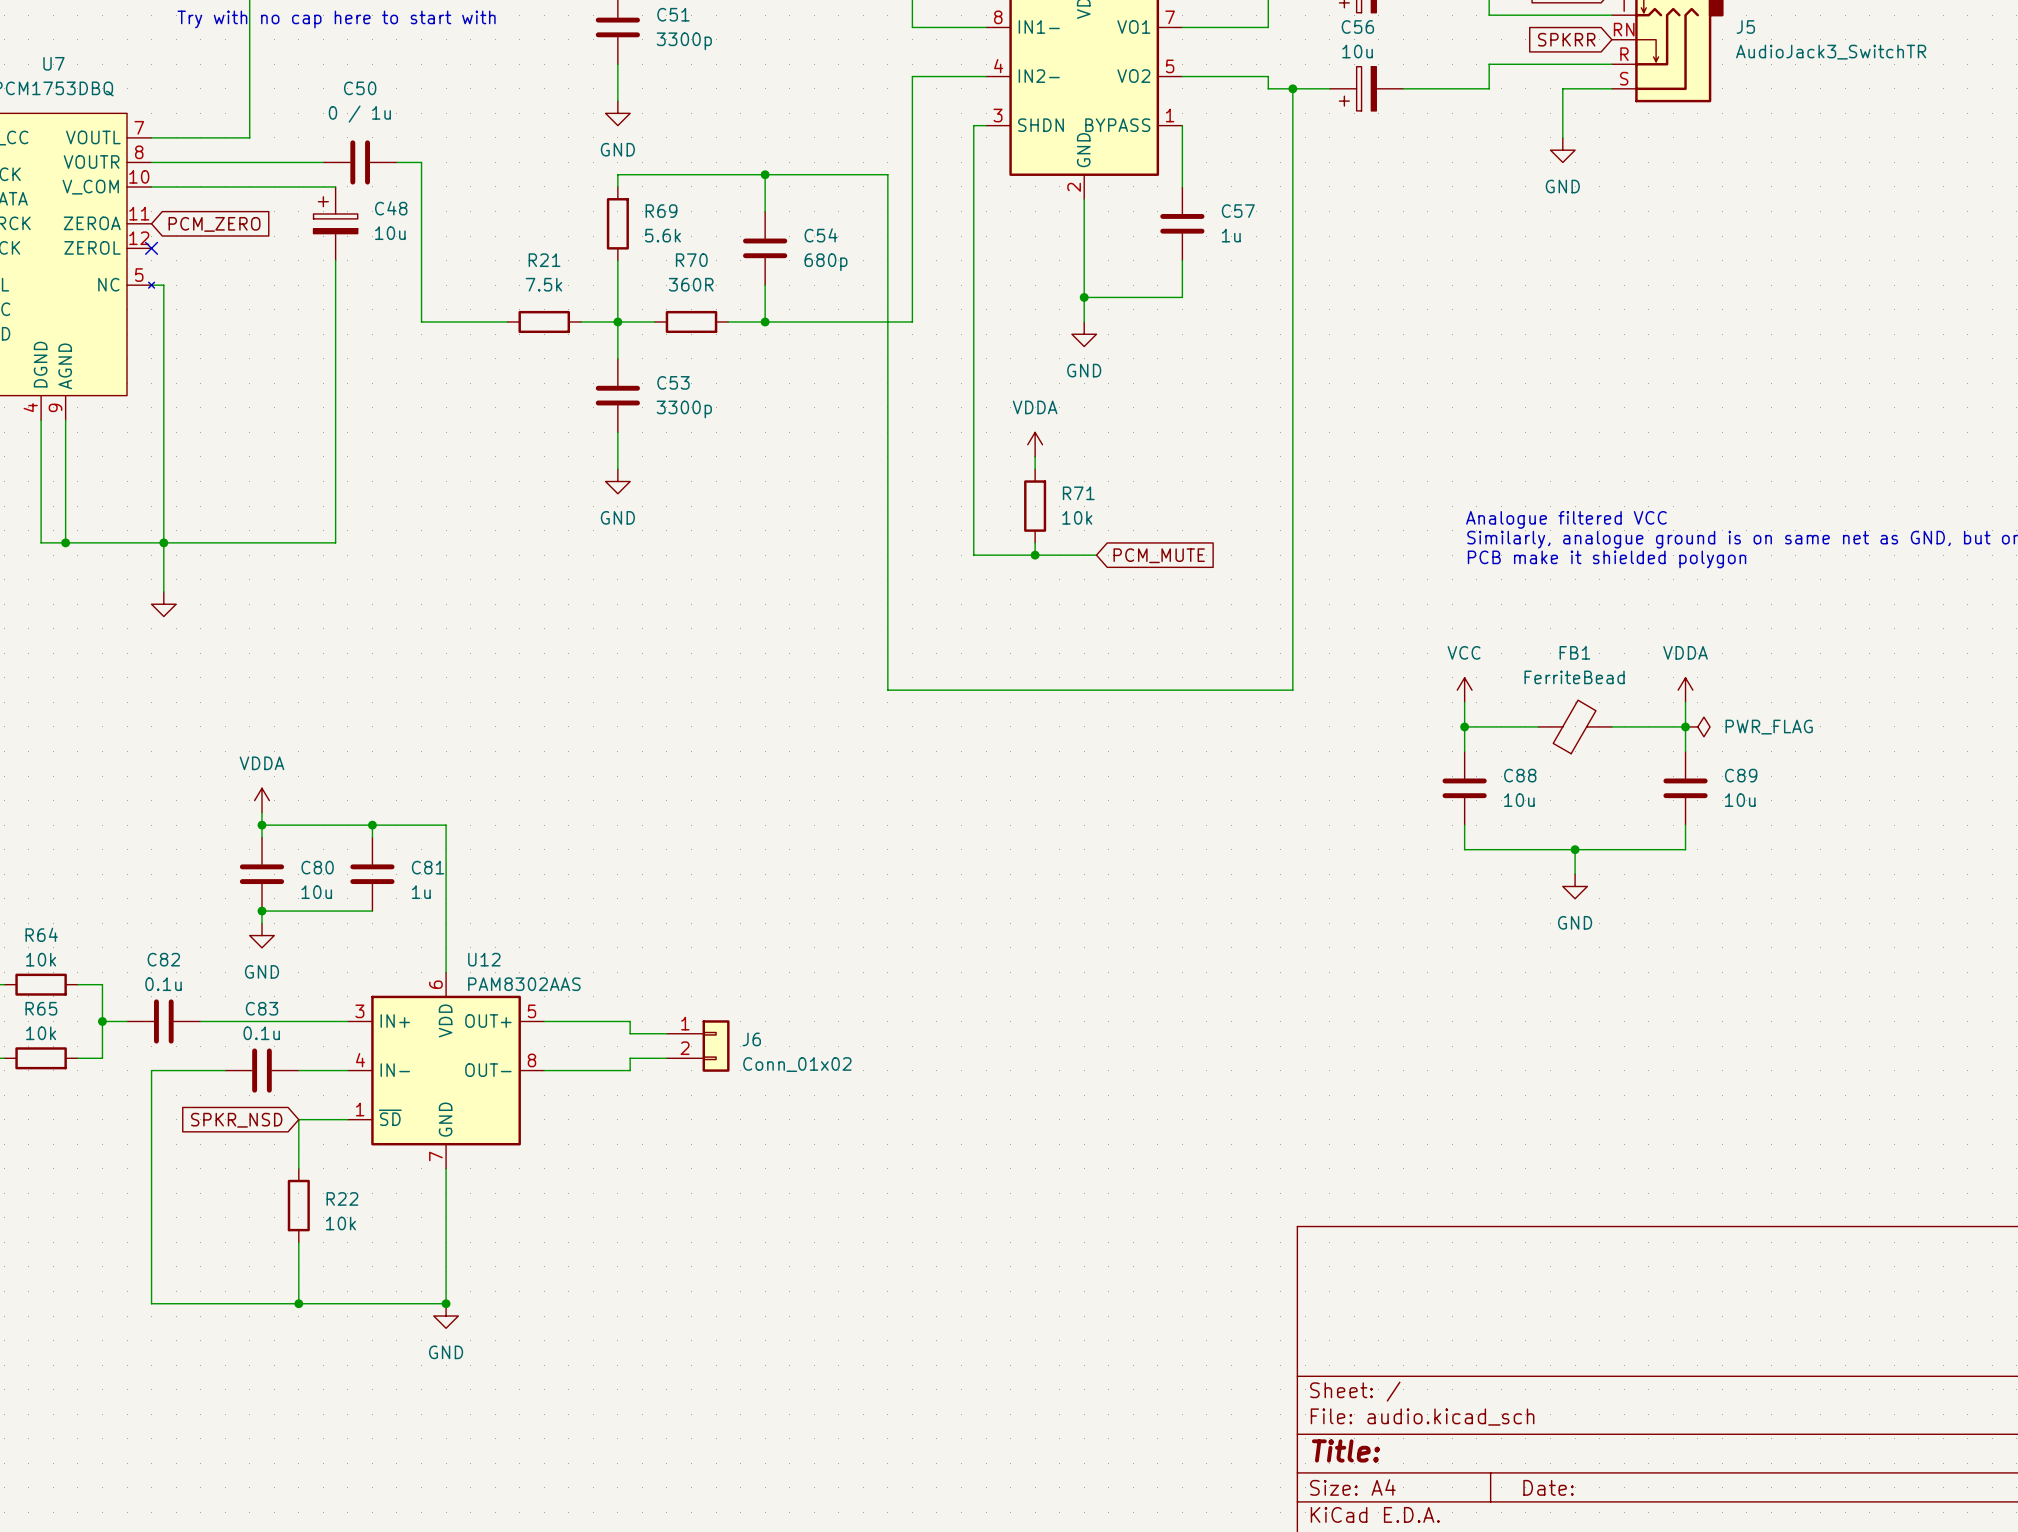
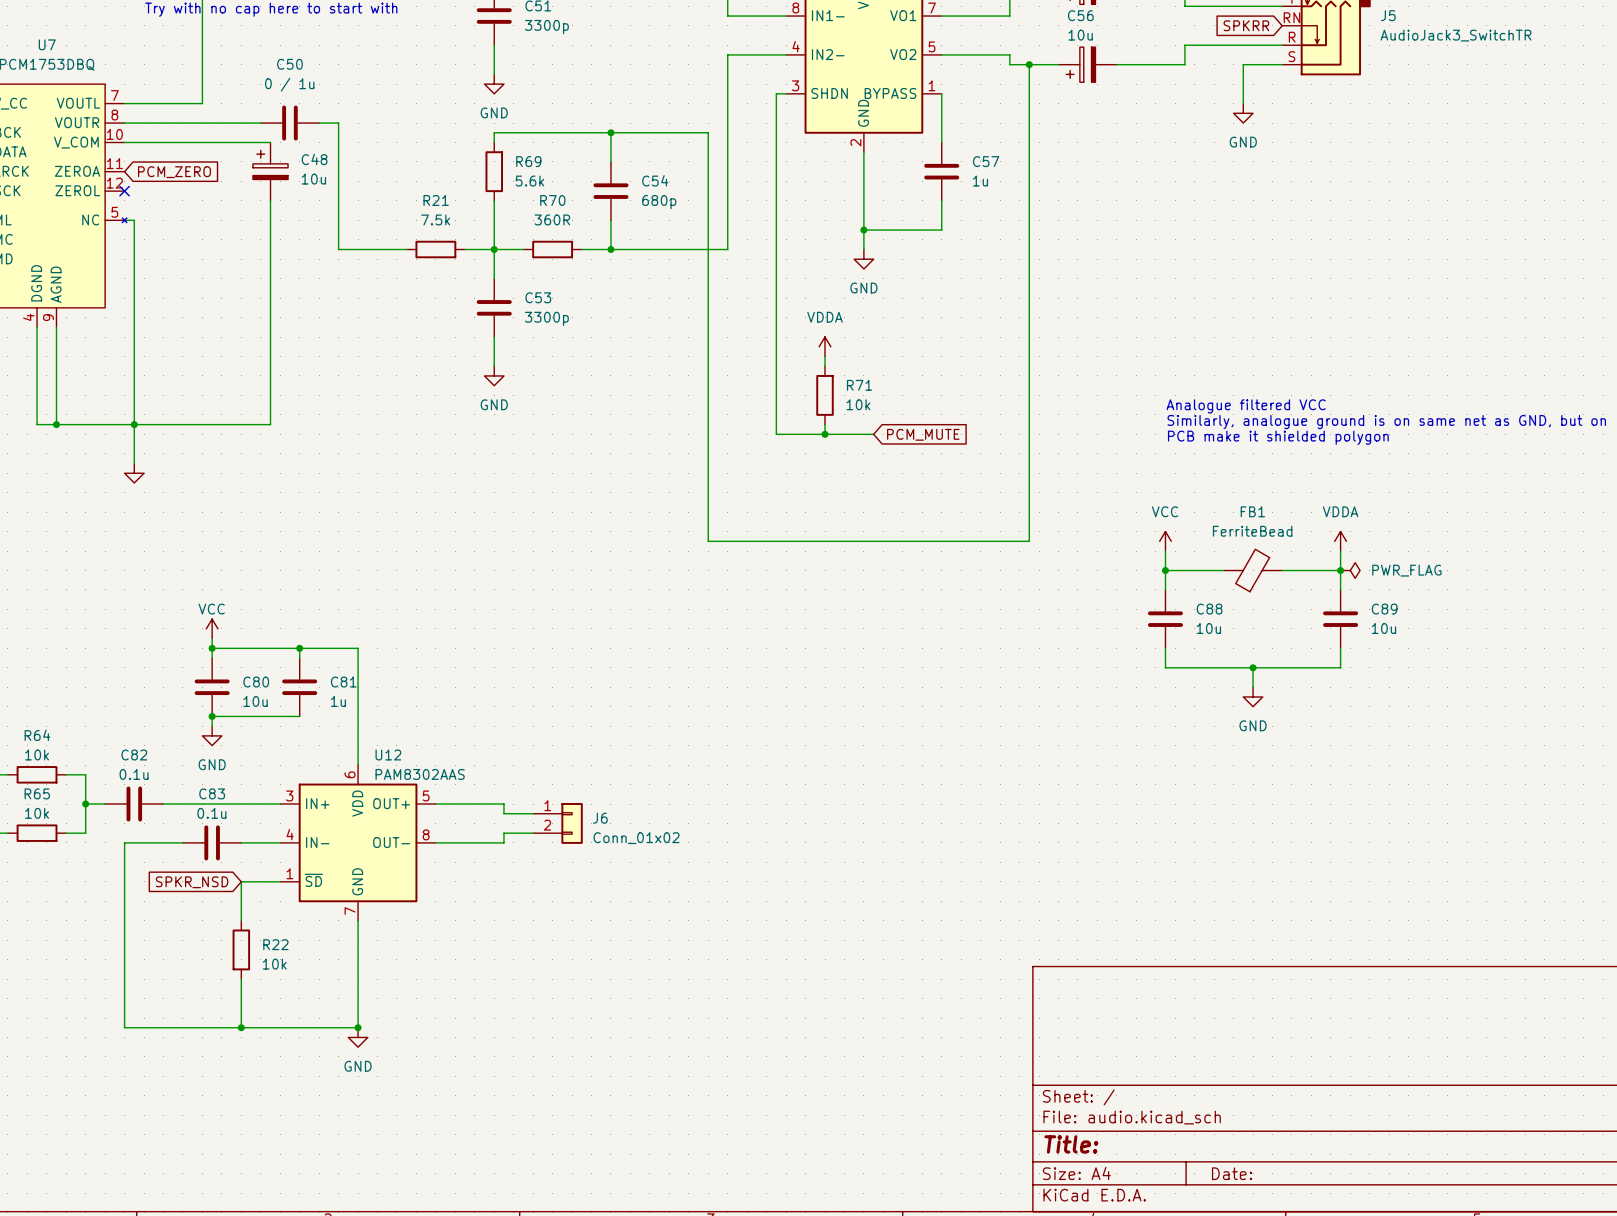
power symbol: VDDA (261, 800) -> VCC (212, 628)

